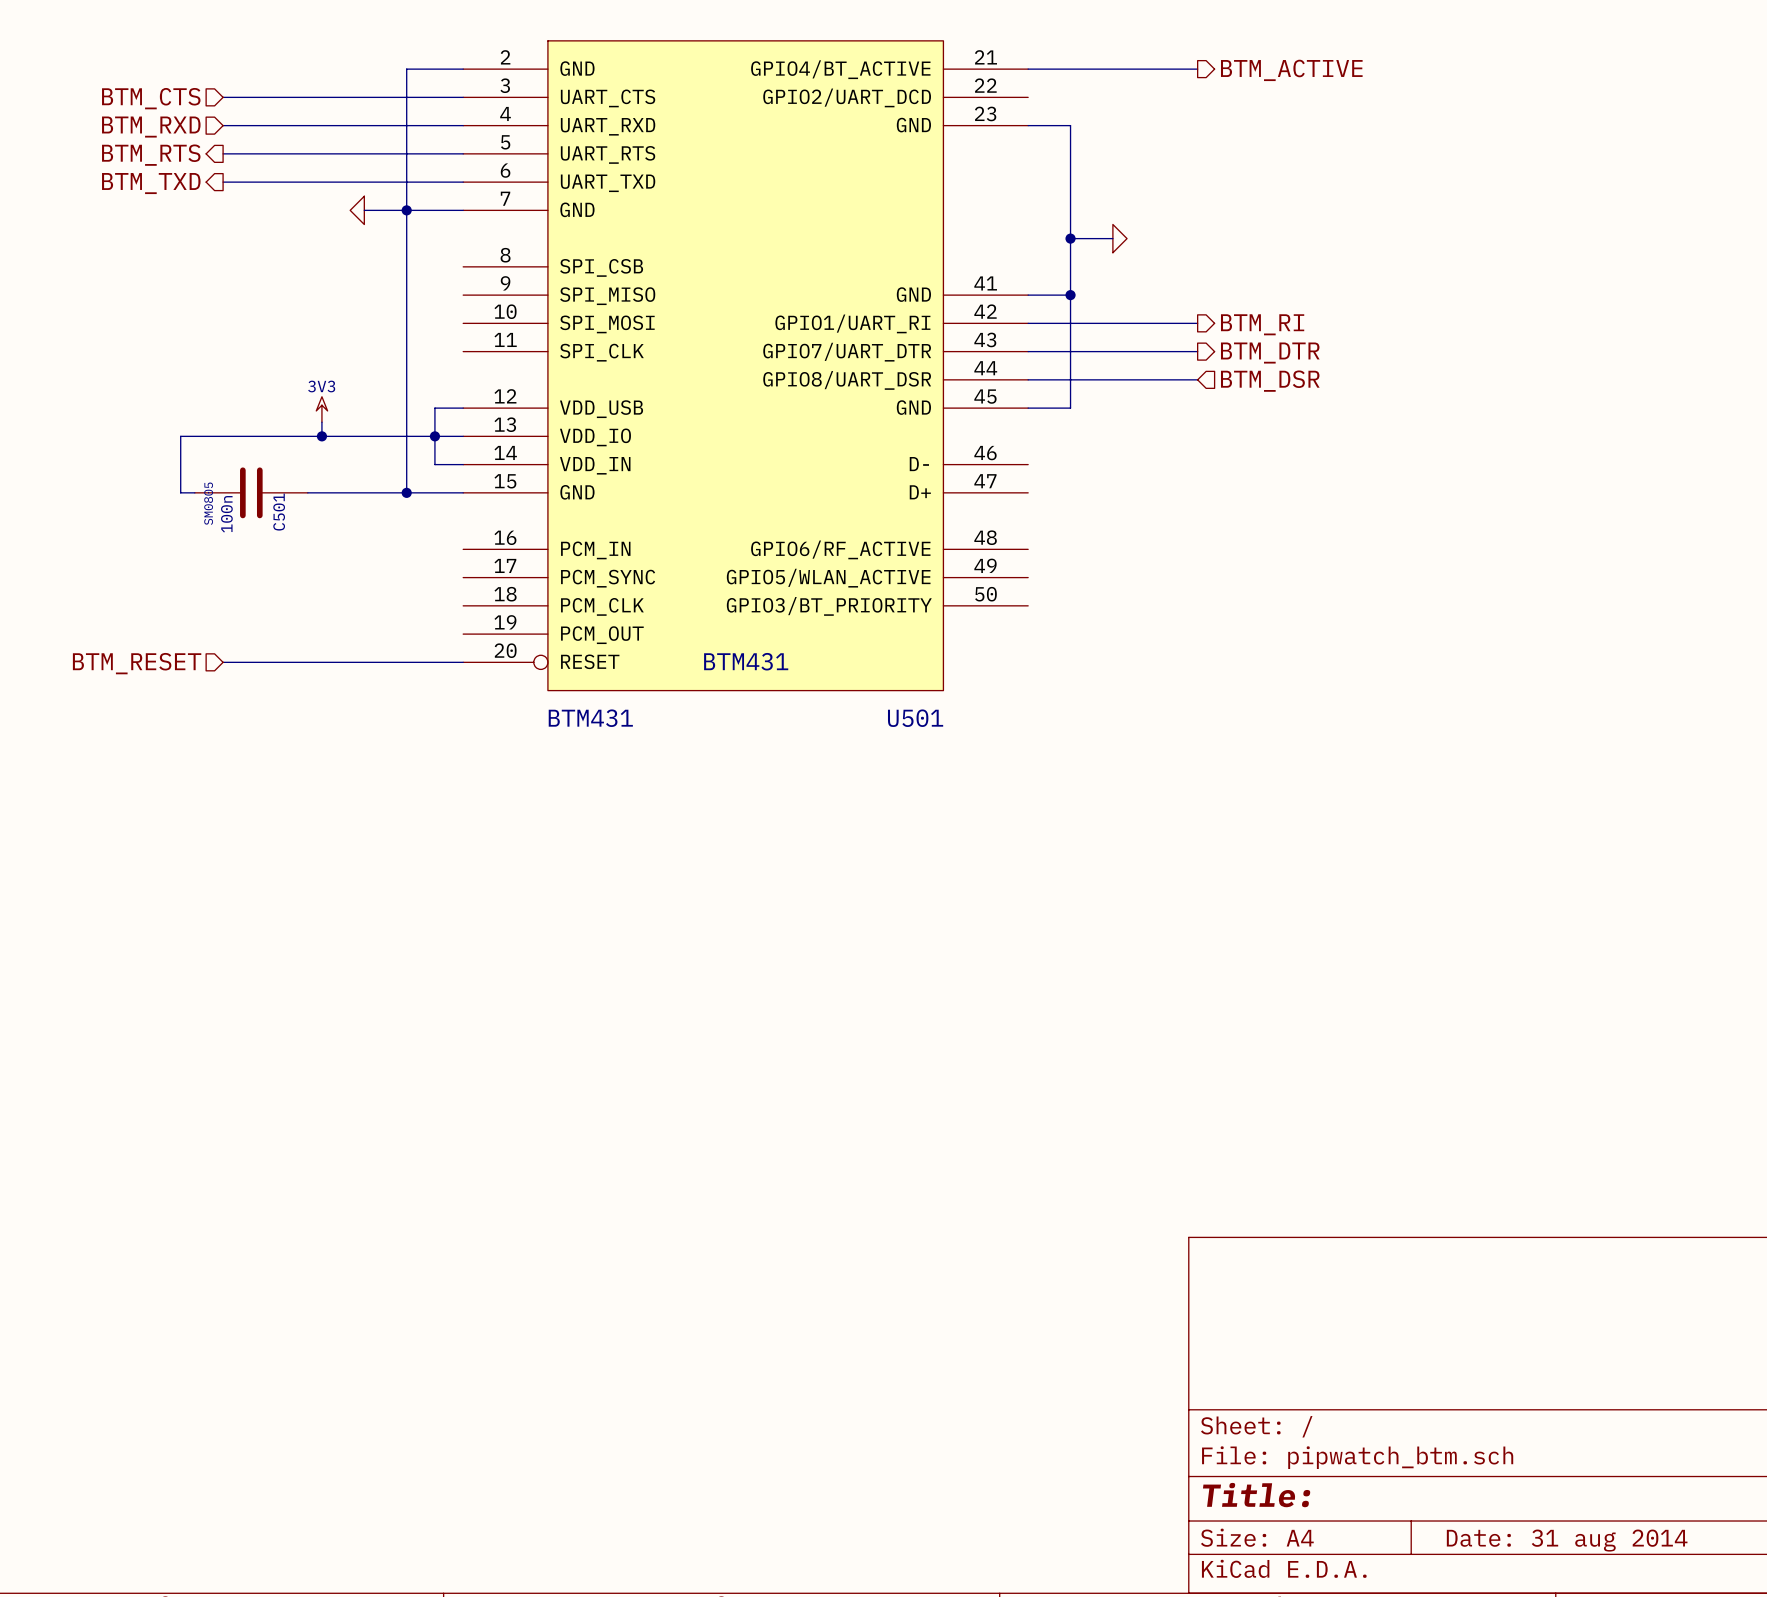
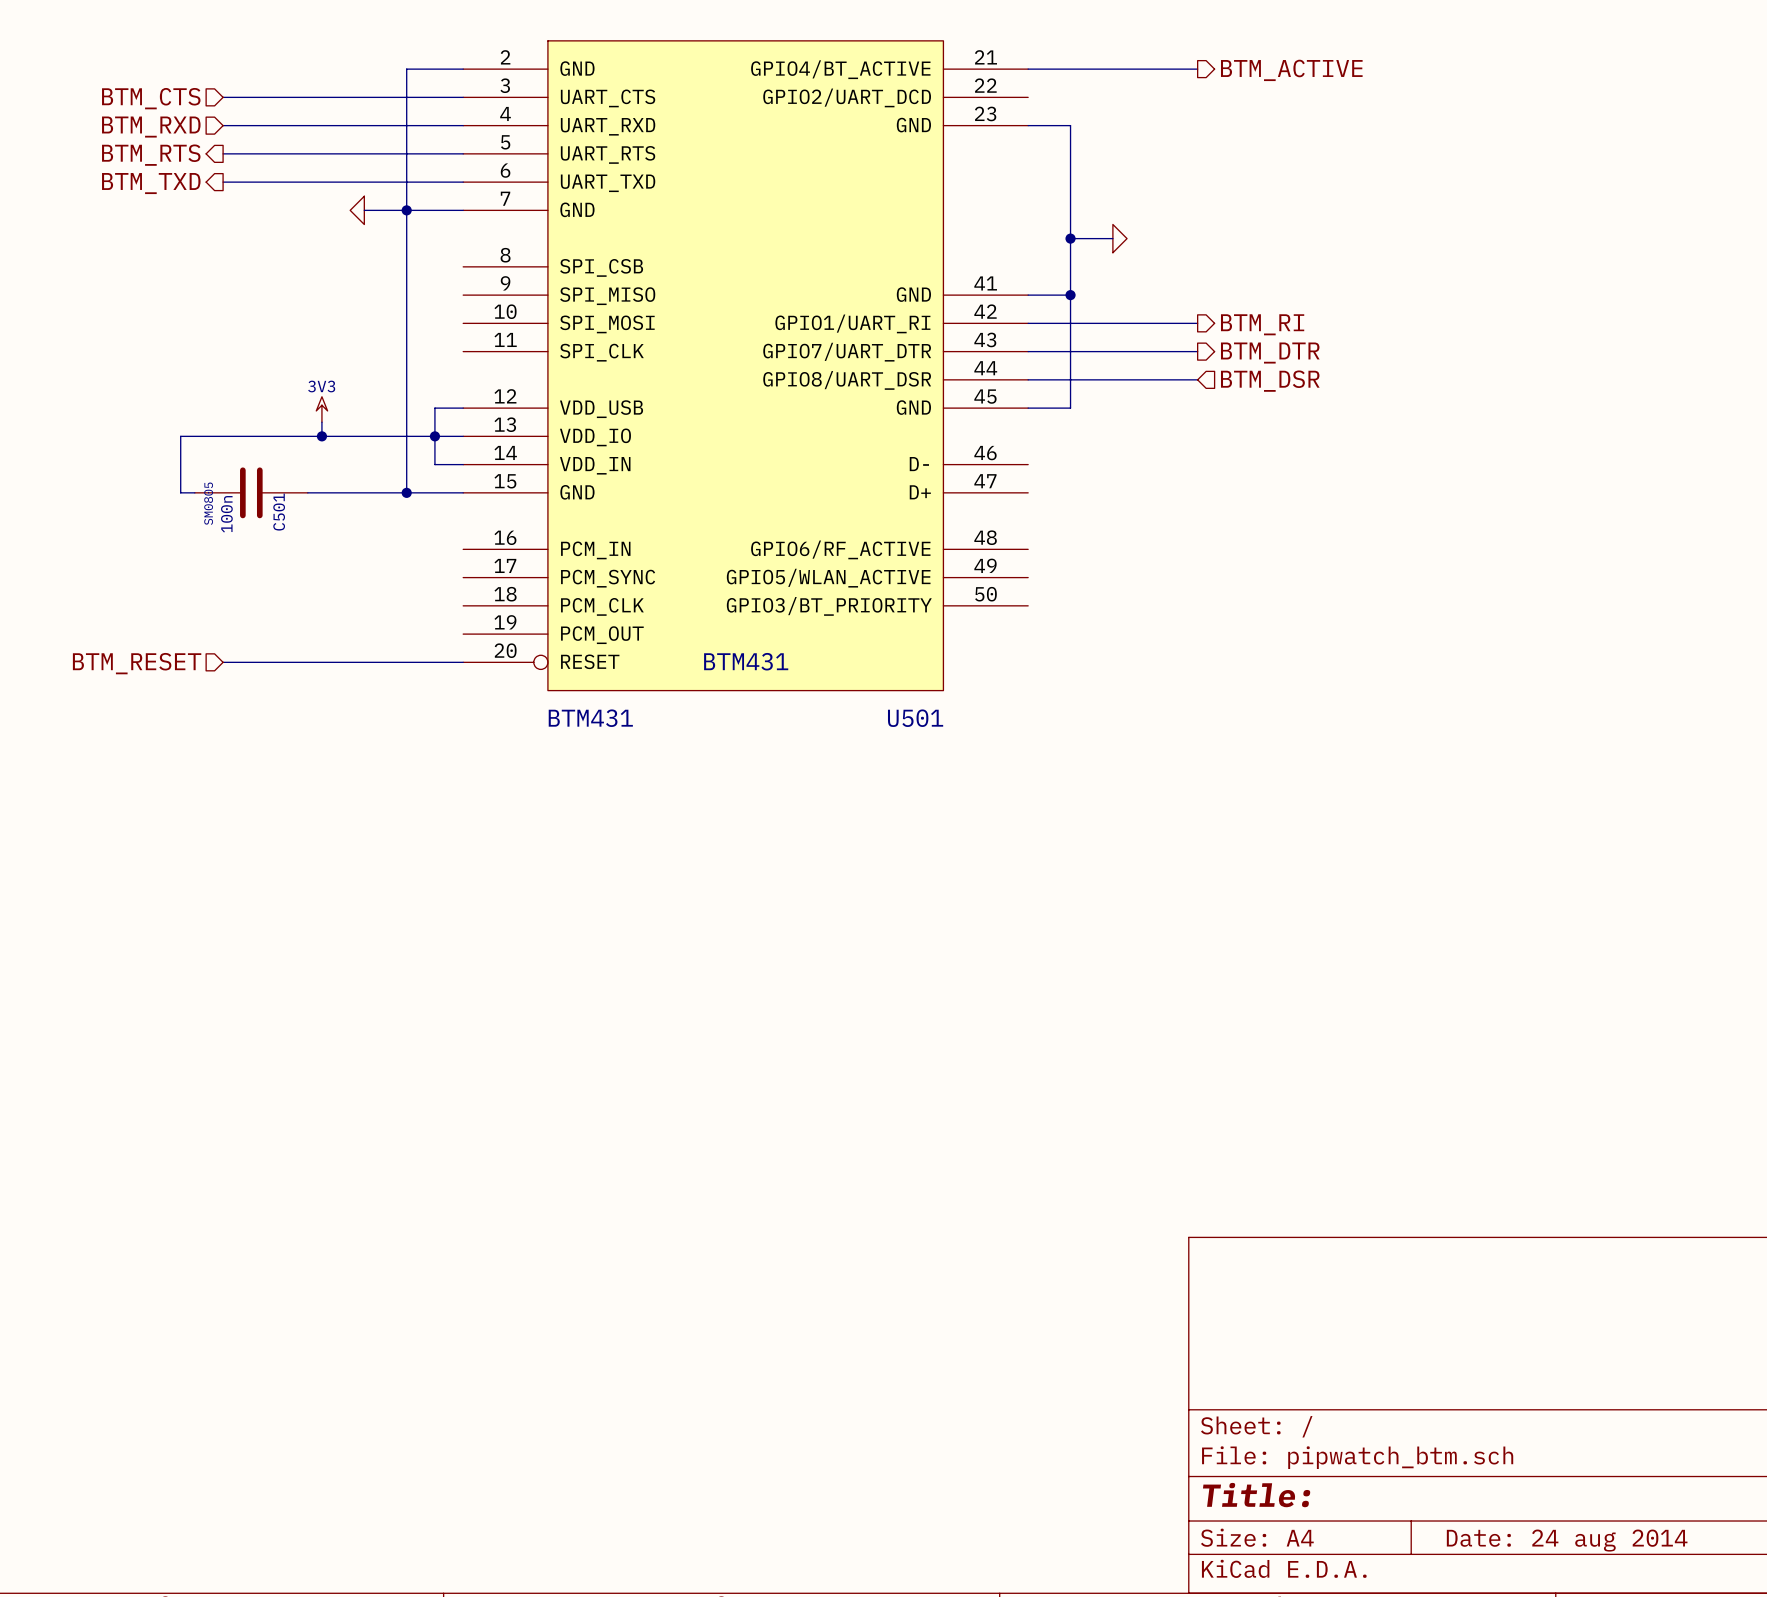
title block: Date: 31 aug 2014 (1567, 1540) -> Date: 24 aug 2014 (1567, 1540)

